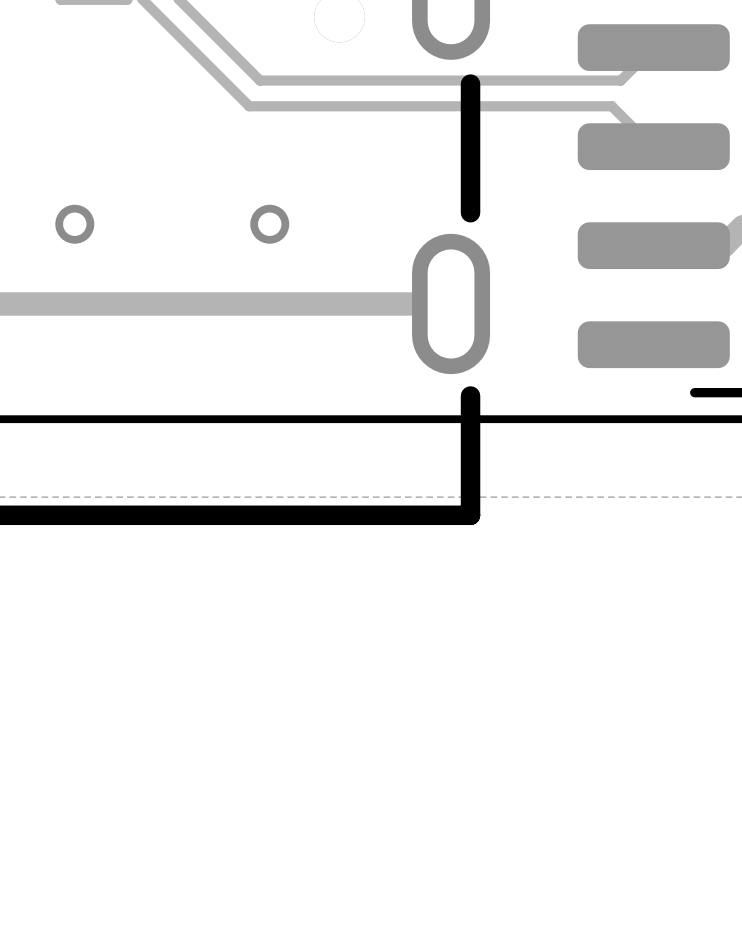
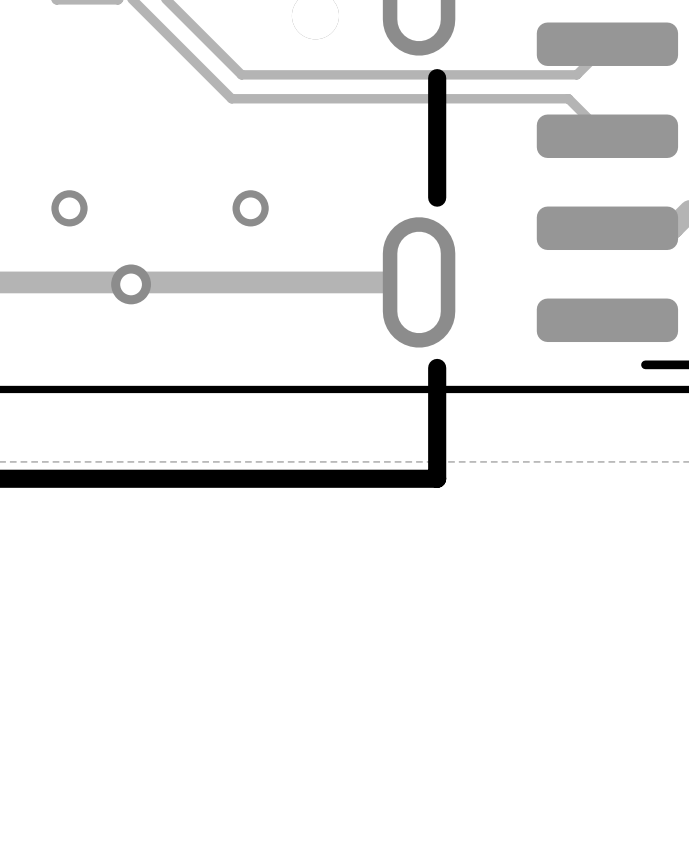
via: none -> (131, 284)

